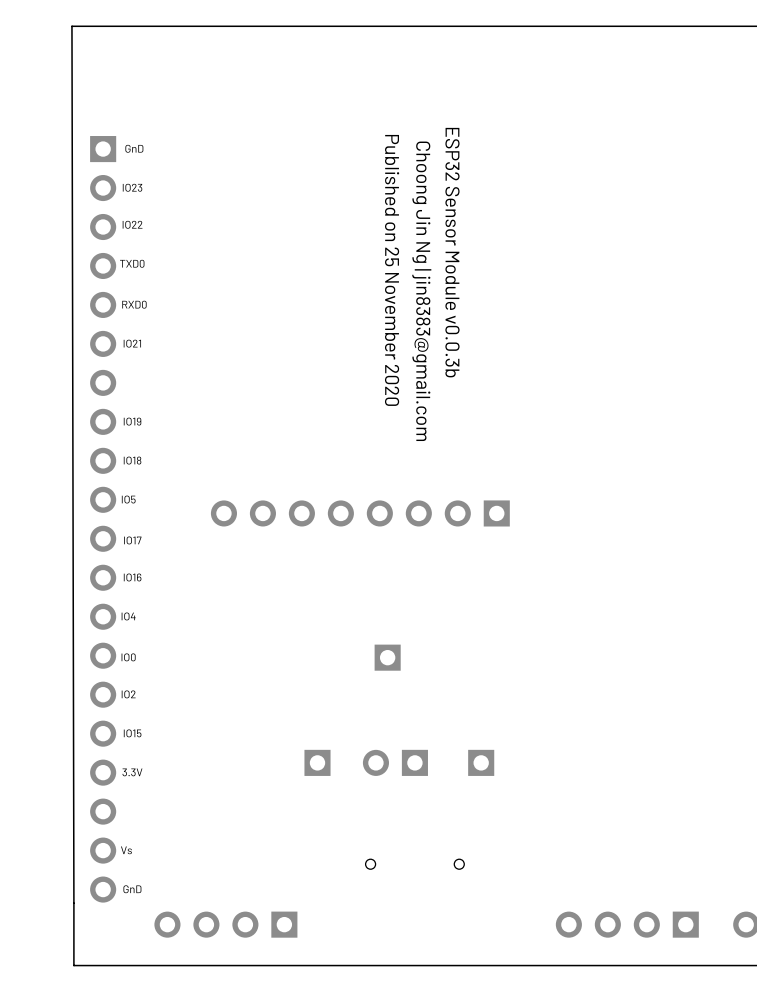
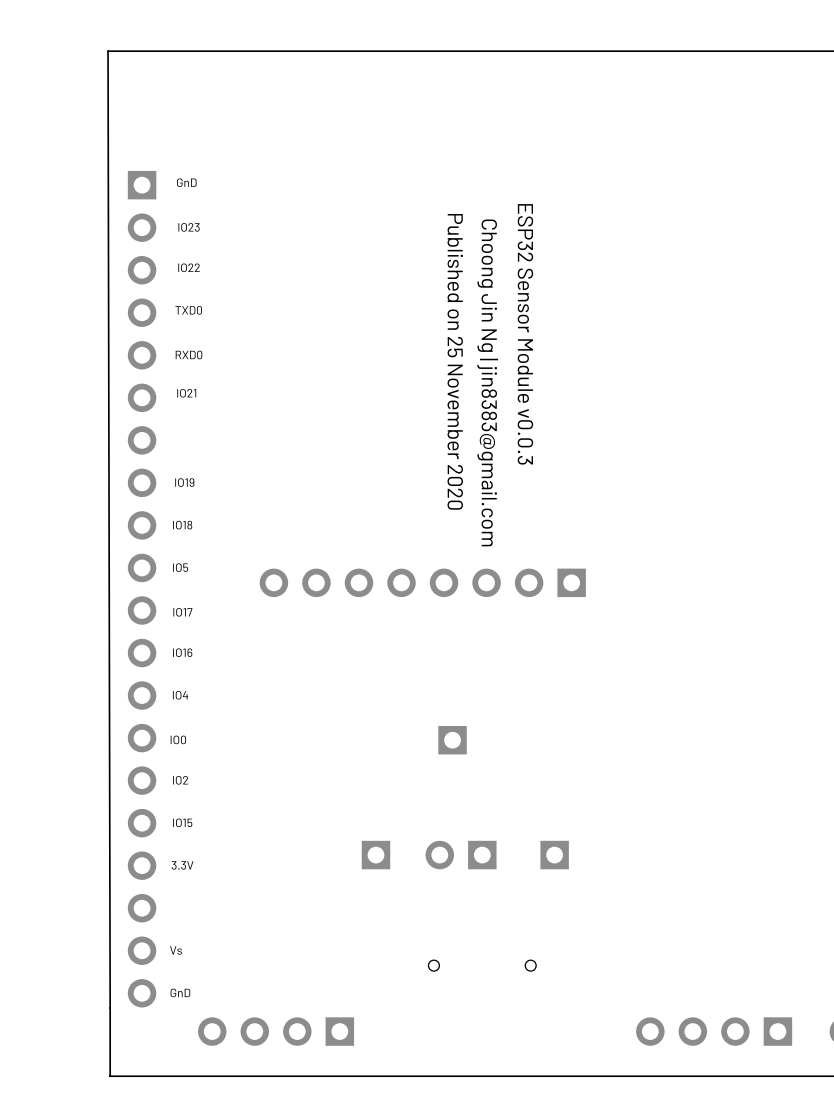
part footprint: [90, 136, 117, 903] -> [127, 170, 157, 1008]
text: ESP32 Sensor Module v0.0.3b (452, 252) -> ESP32 Sensor Module v0.0.3 (525, 334)
text position: Published on 25 November 2020 (392, 270) -> Published on 25 November 2020 (455, 361)
text position: Choong Jin Ng | jin8383@gmail.com (421, 291) -> Choong Jin Ng | jin8383@gmail.com (487, 382)

